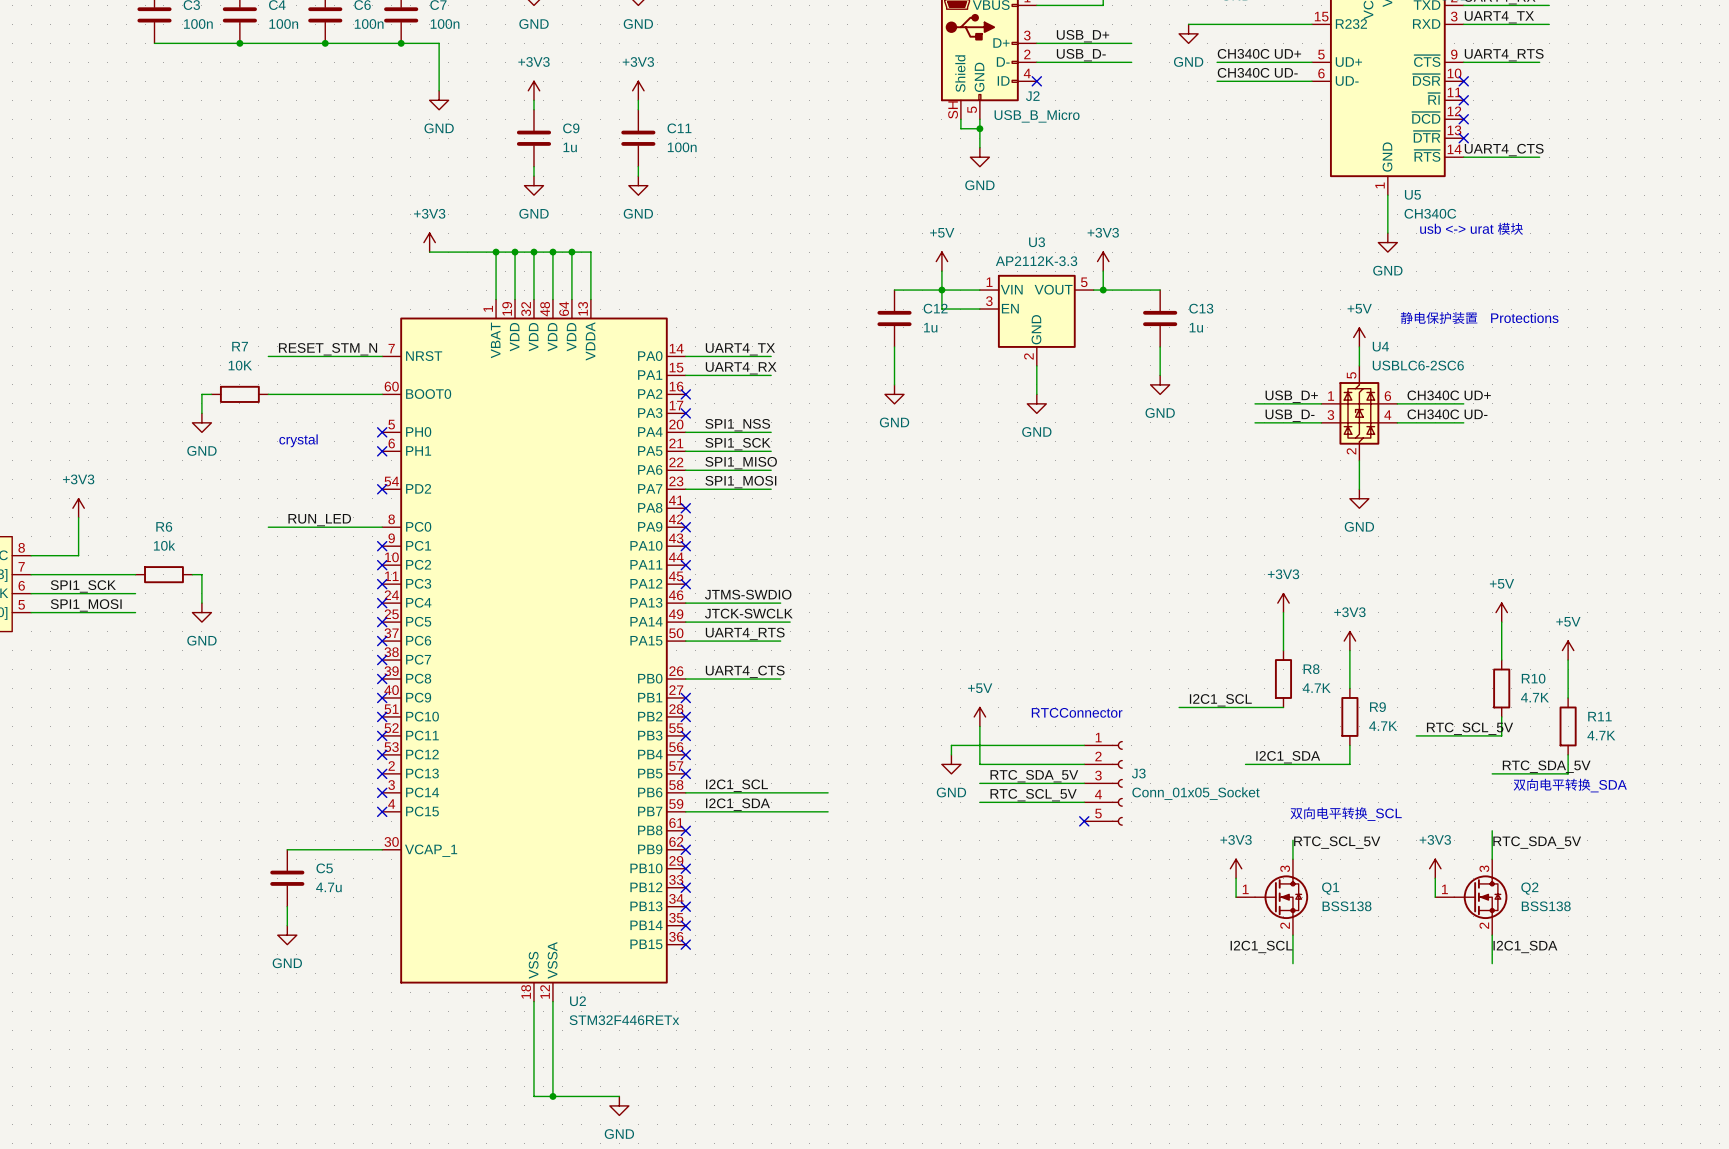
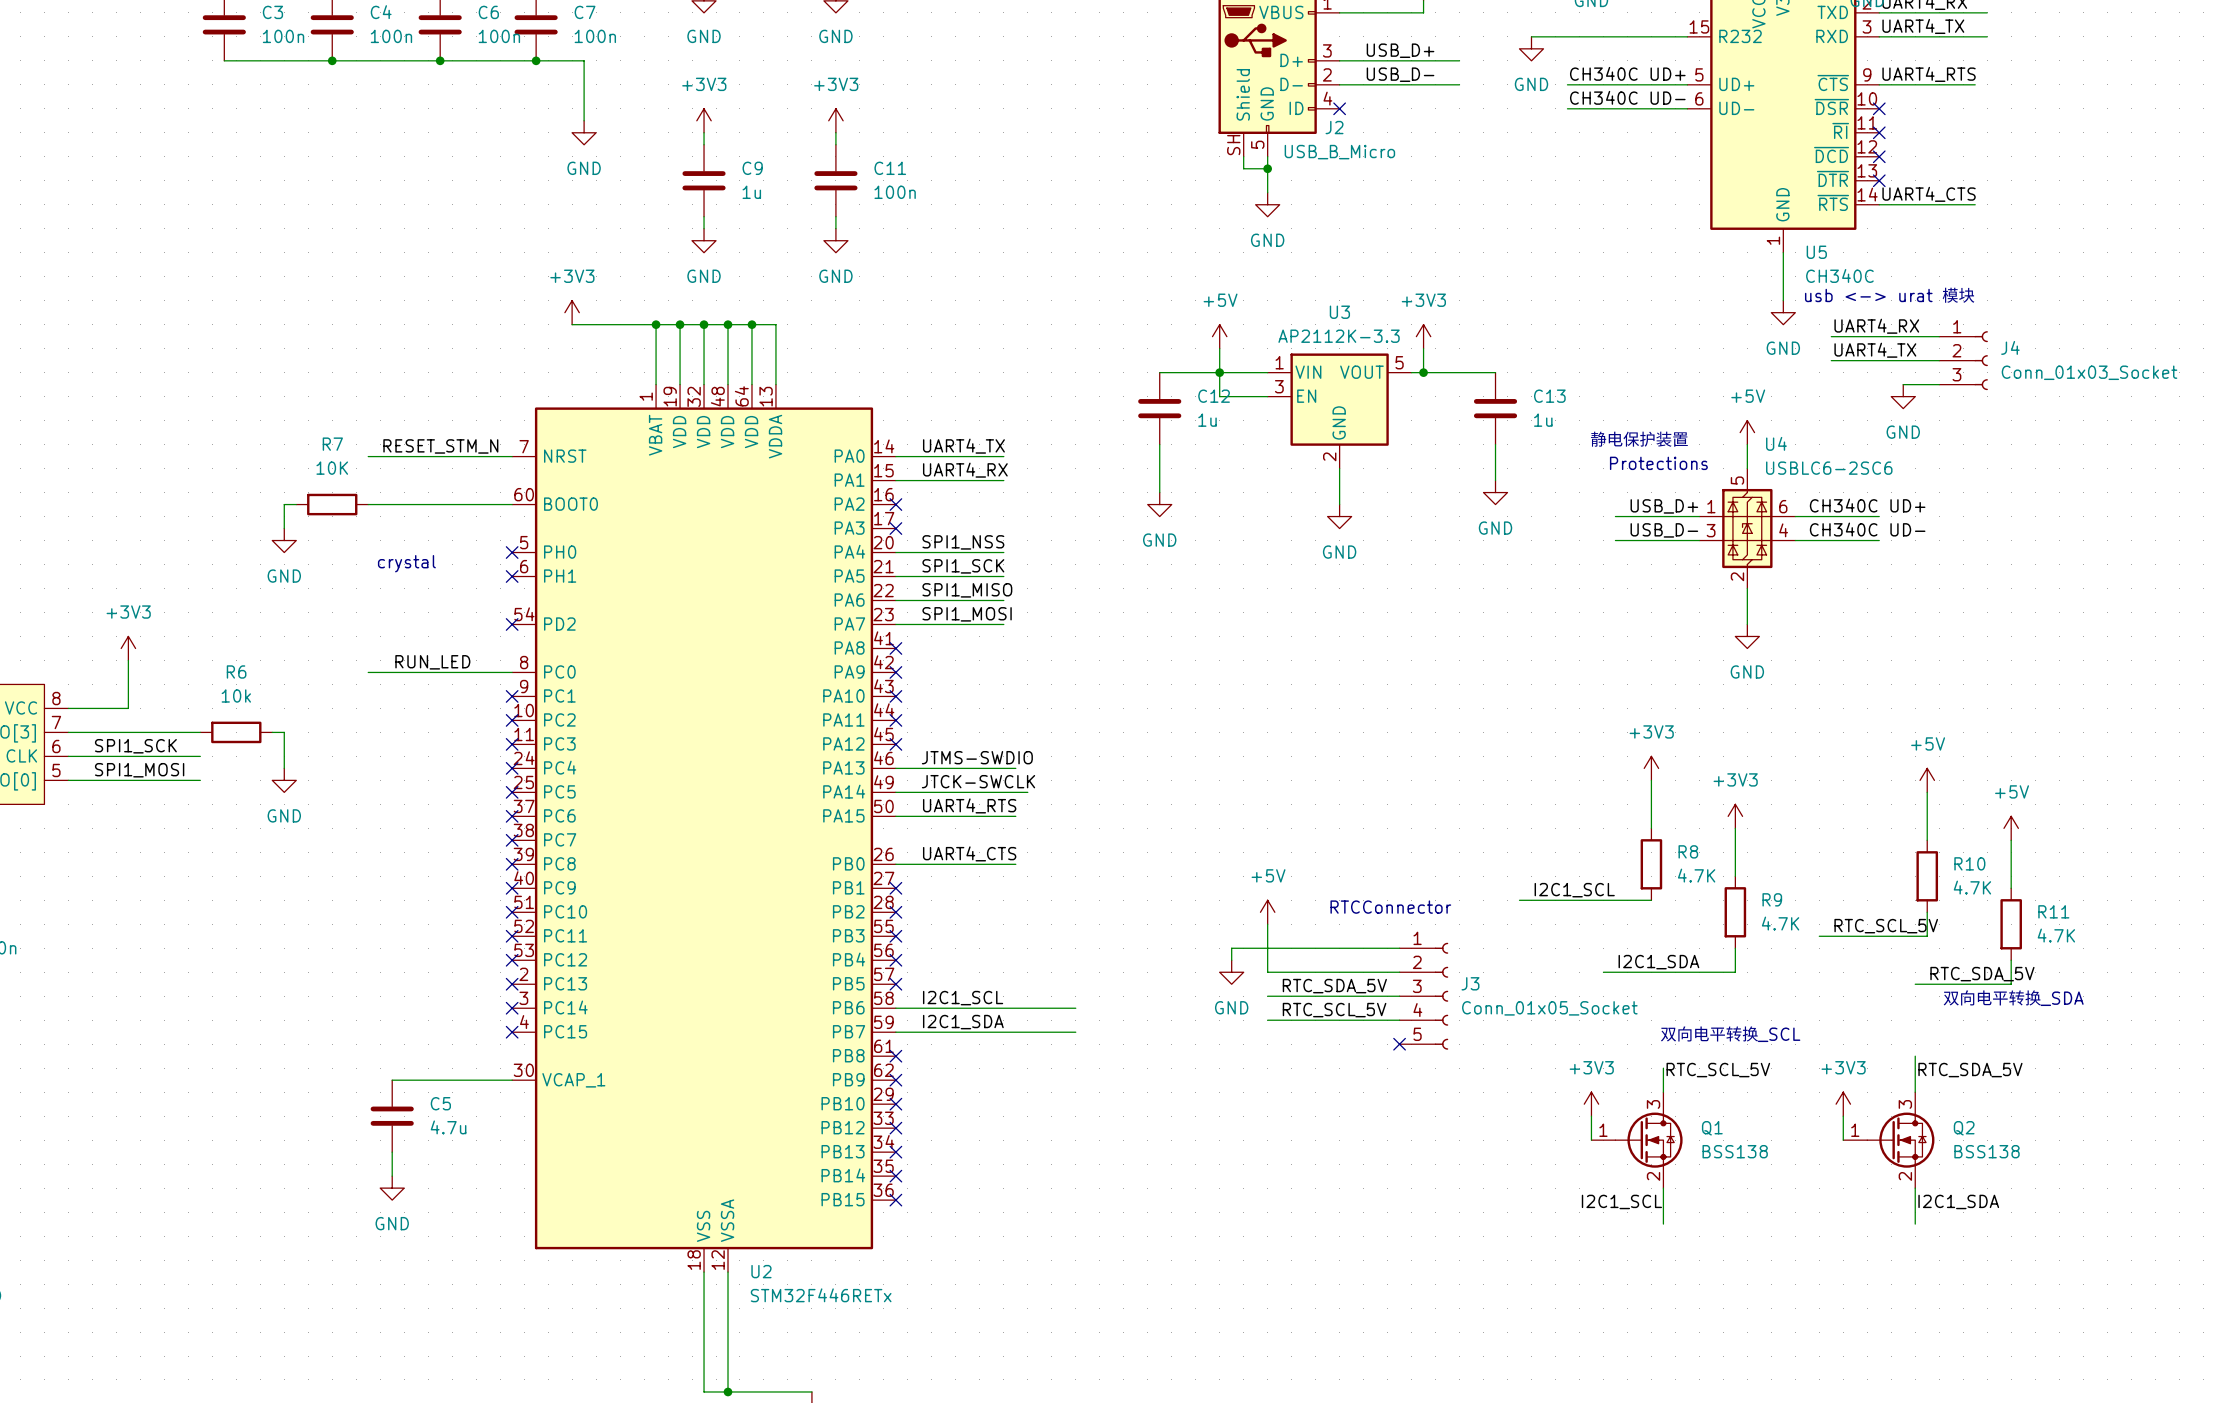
label: none -> UART4_RX (1876, 326)
wire: none -> (1831, 336) (1939, 336)
label: none -> UART4_TX (1875, 350)
wire: none -> (1831, 360) (1939, 360)
J4: none -> Conn_01x03_Socket (1963, 360)
wire: none -> (1903, 384) (1939, 384)
power symbol: none -> GND (1903, 396)
text: Protections (1524, 317) -> none
text position: 静电保护装置 (1439, 318) -> 静电保护装置 (1639, 439)
text: none -> Protections (1658, 463)

